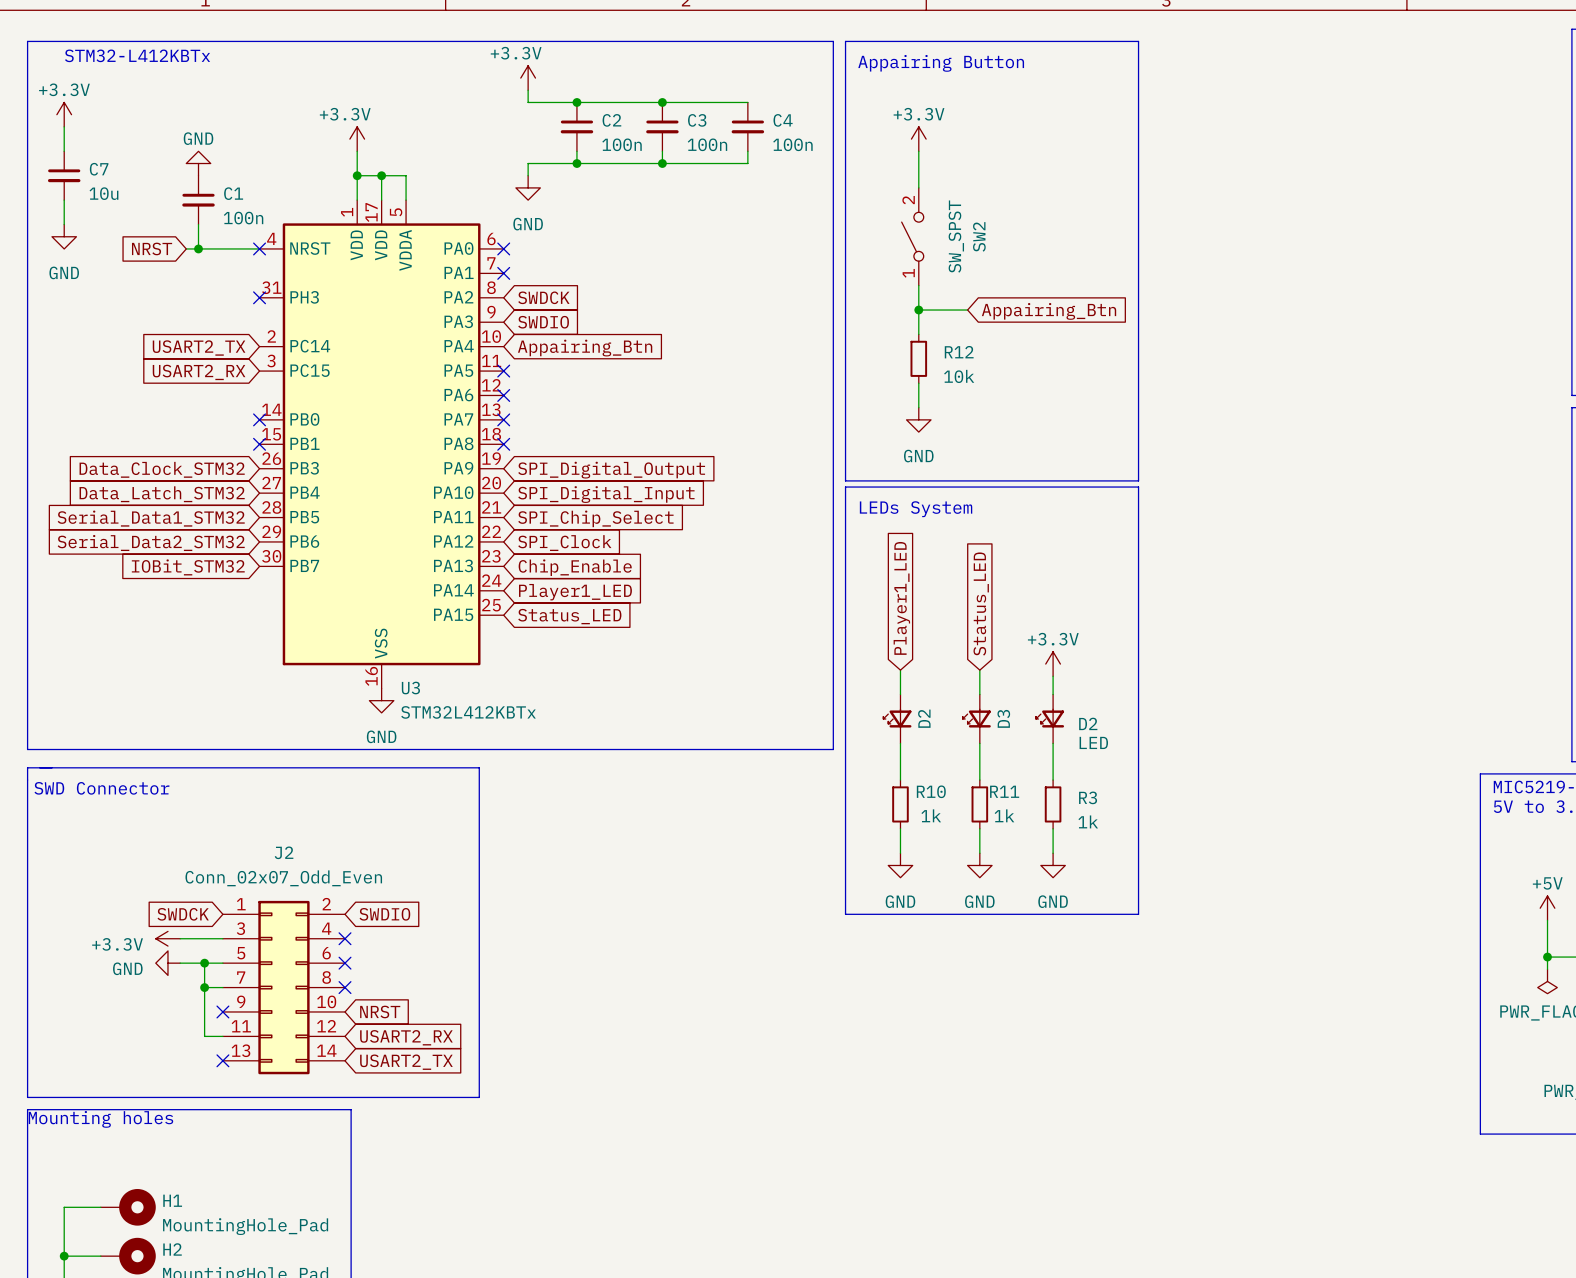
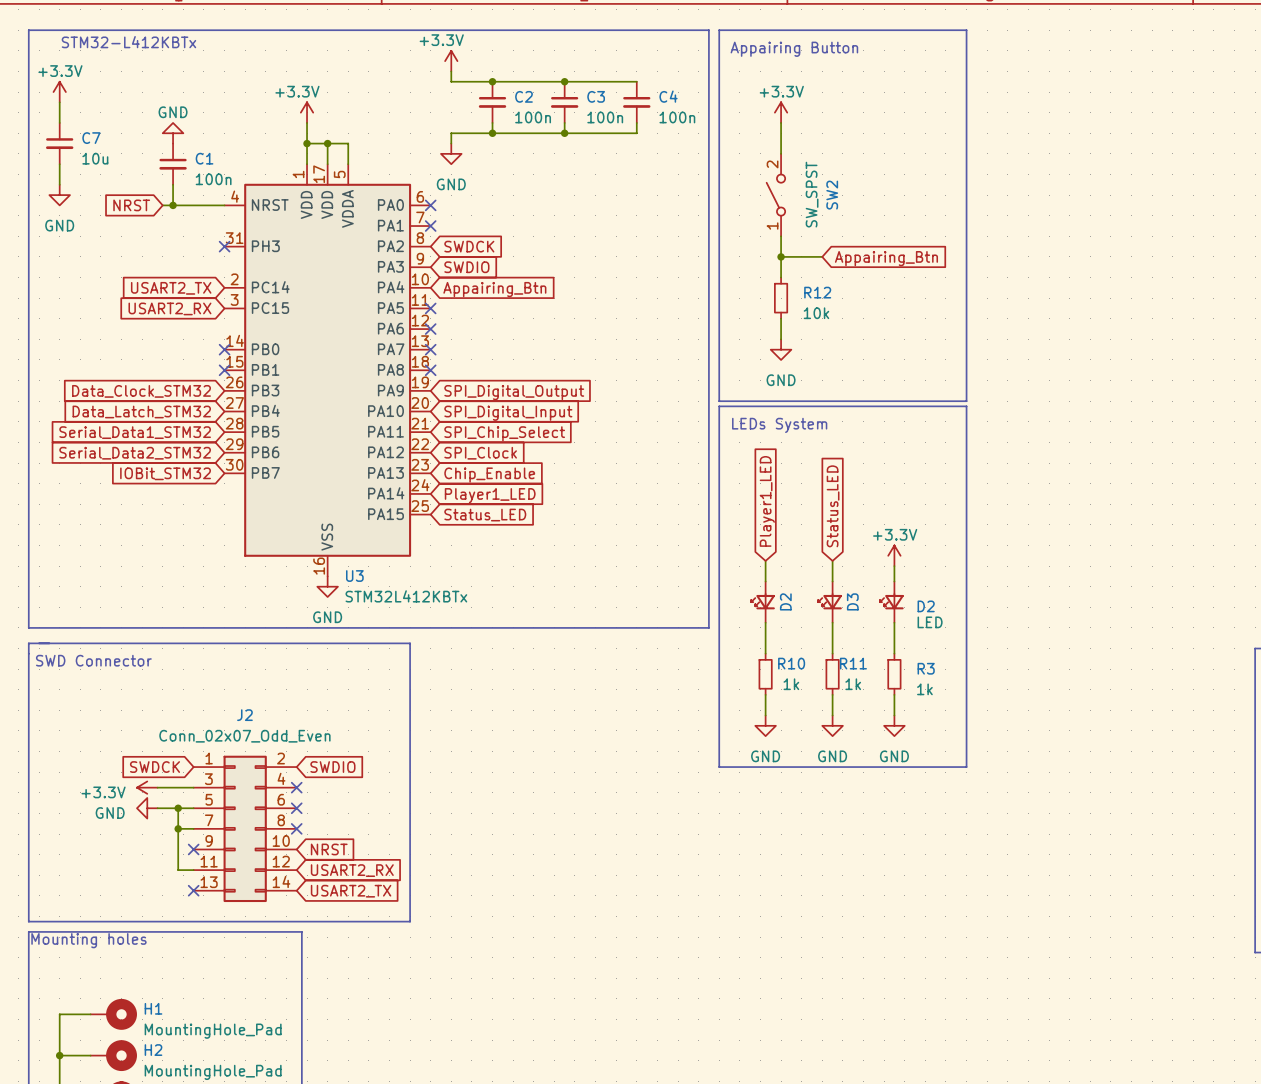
no-connect mark: (259, 248) -> none

